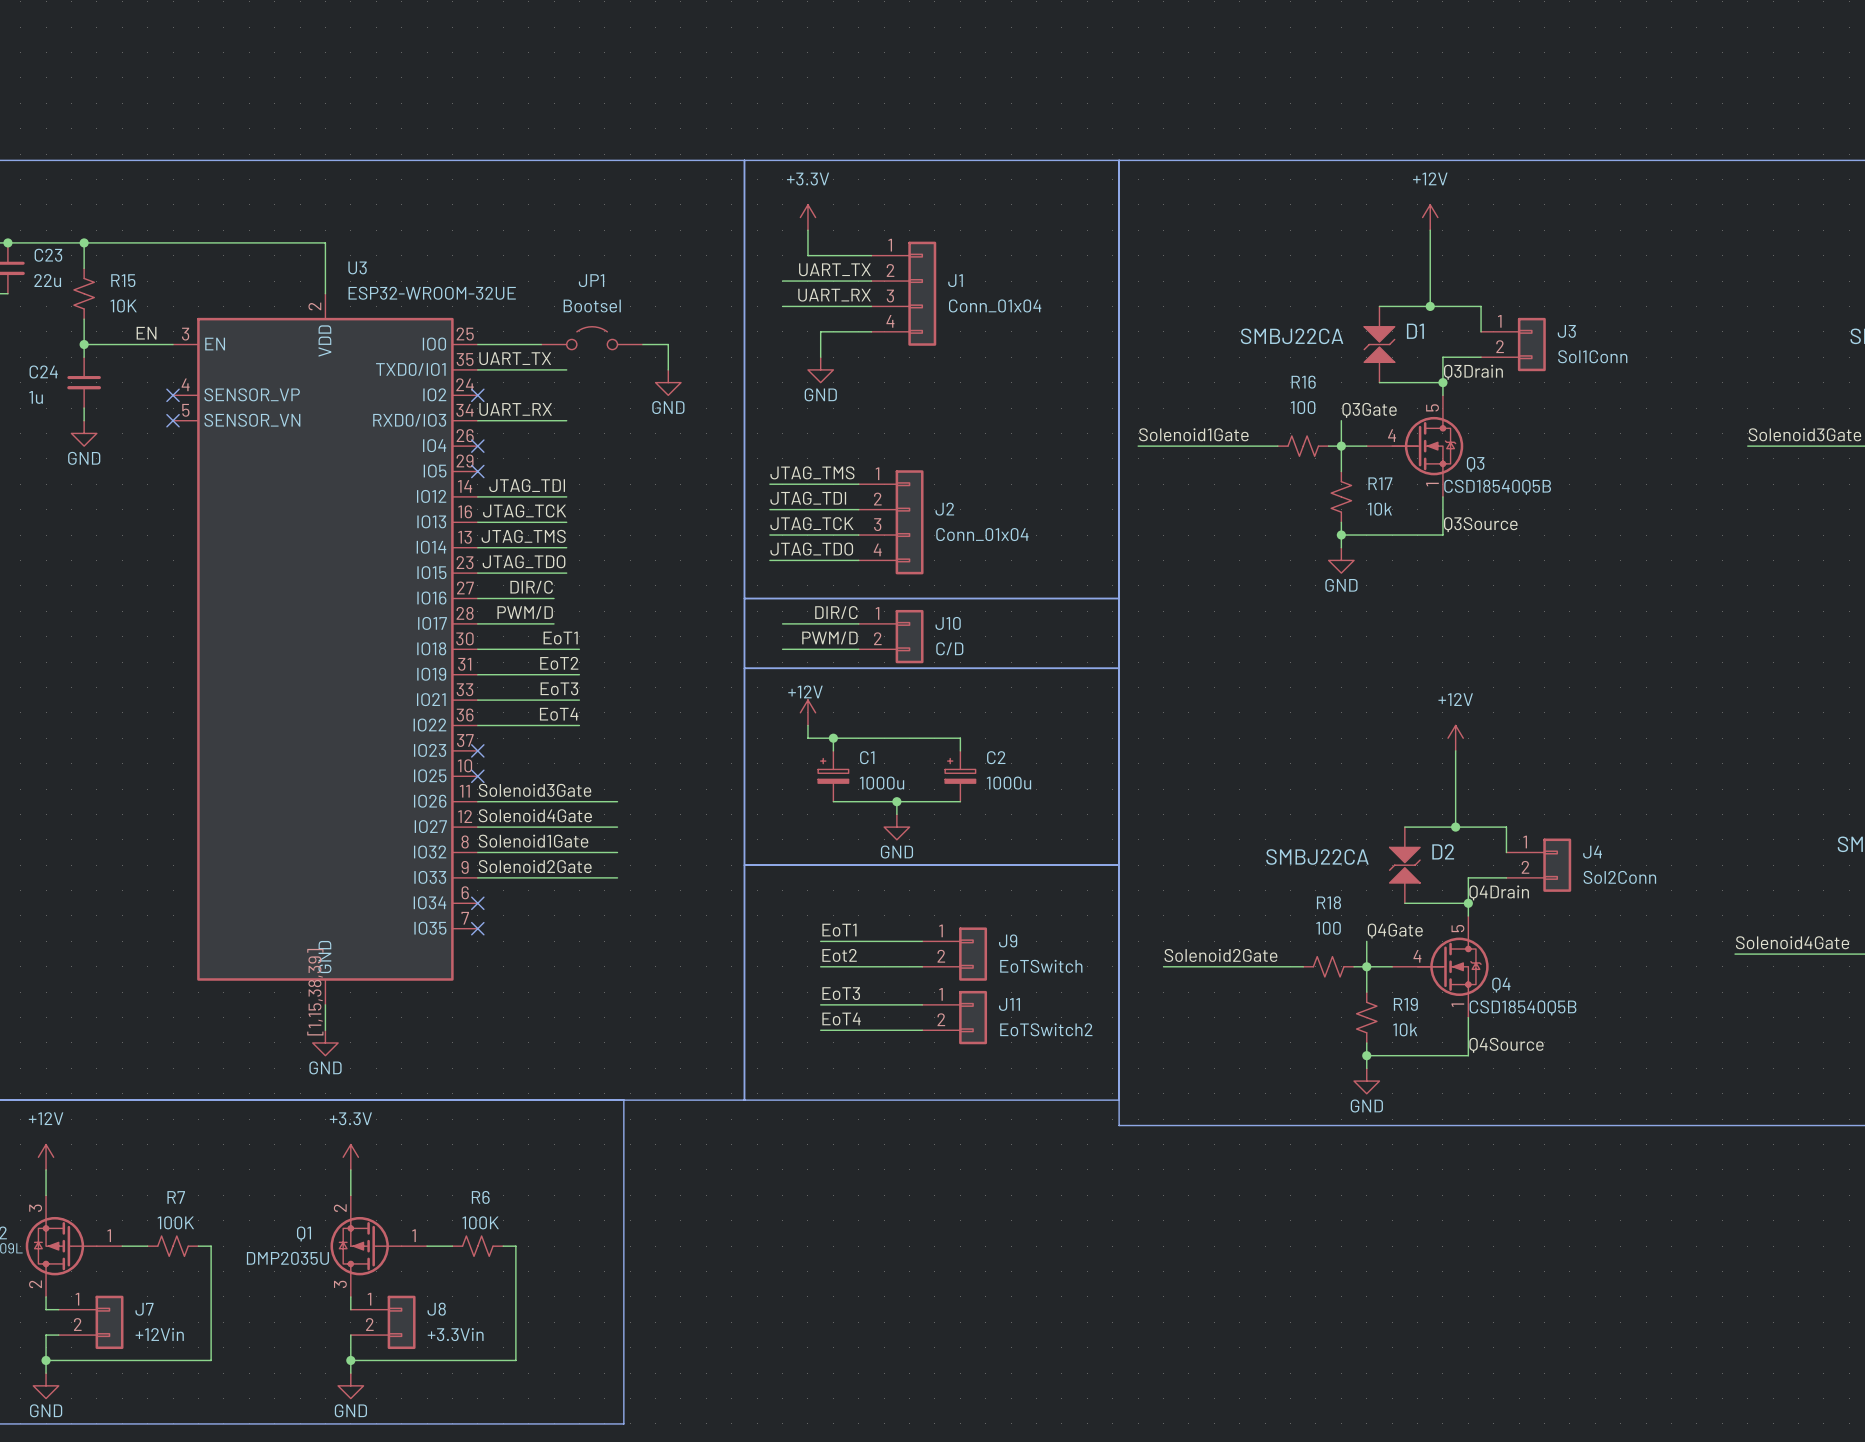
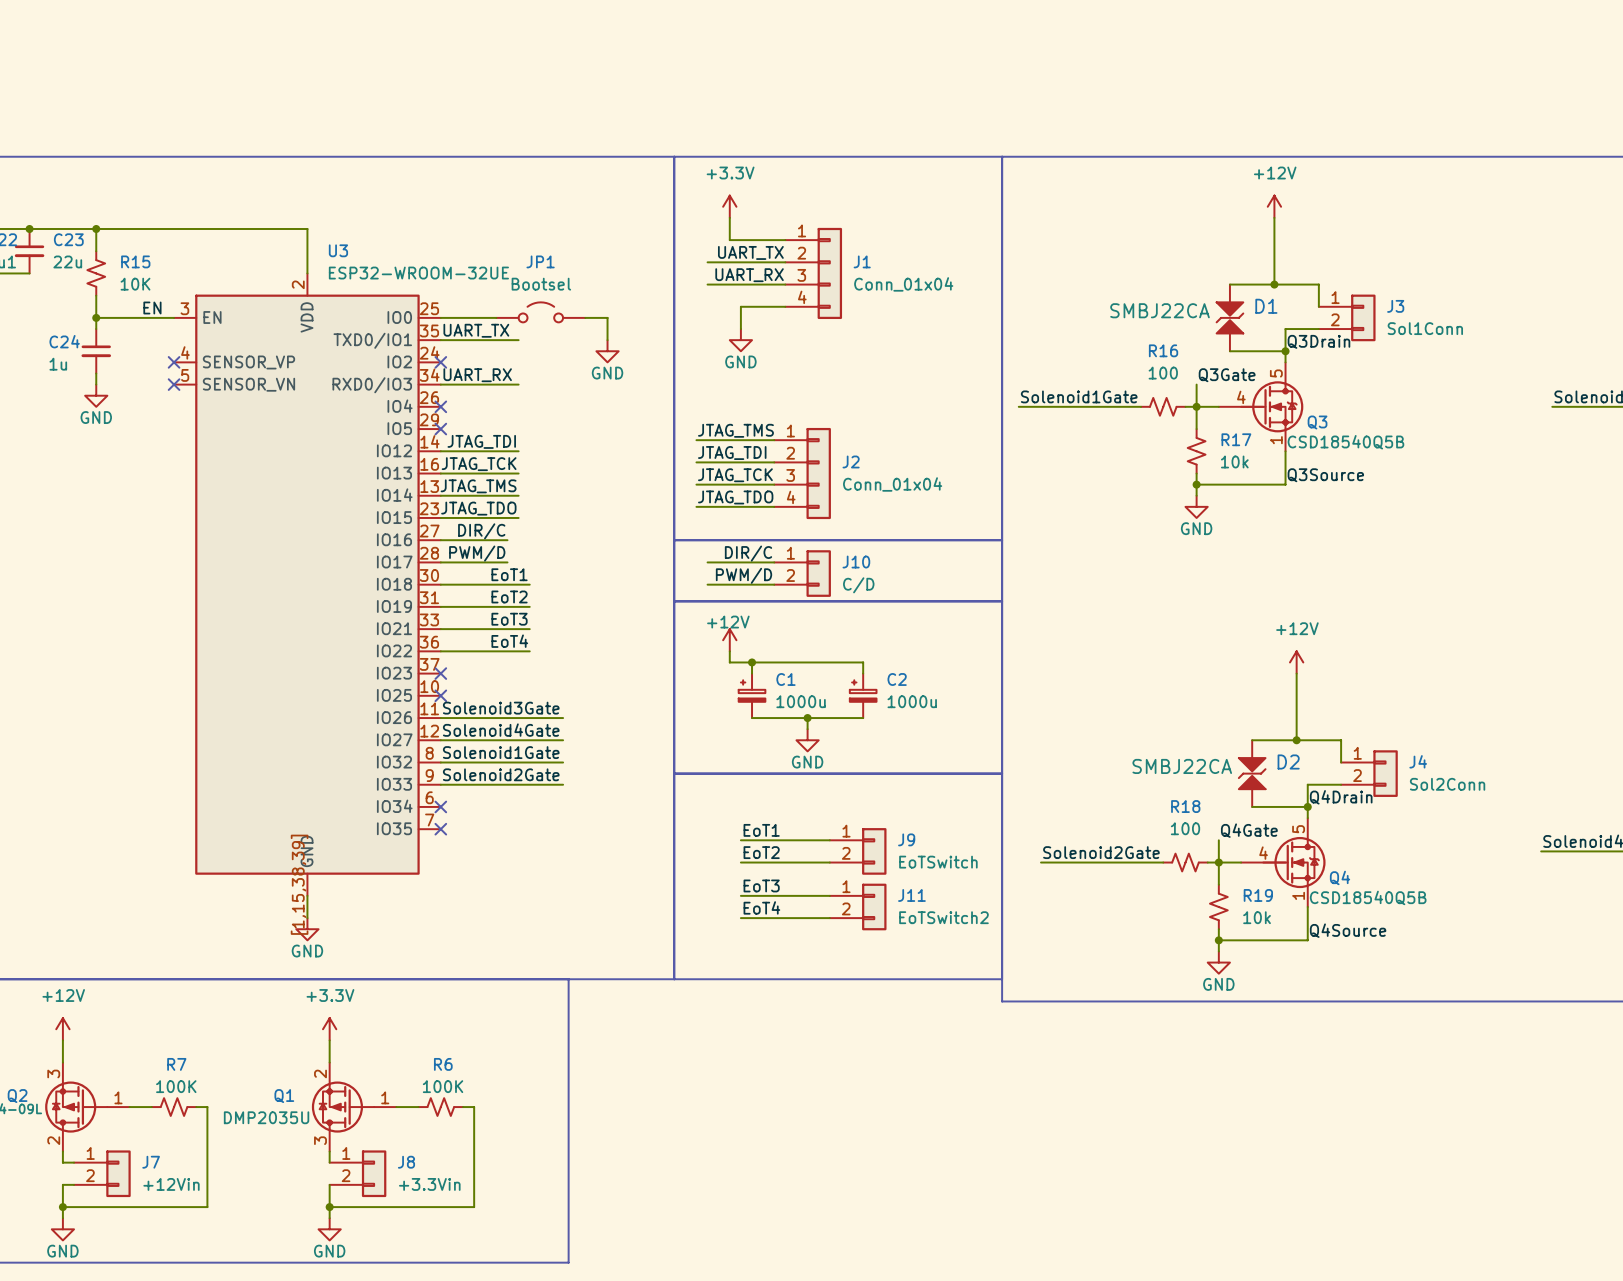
label: Eot2 (839, 955) -> EoT2 (761, 852)

